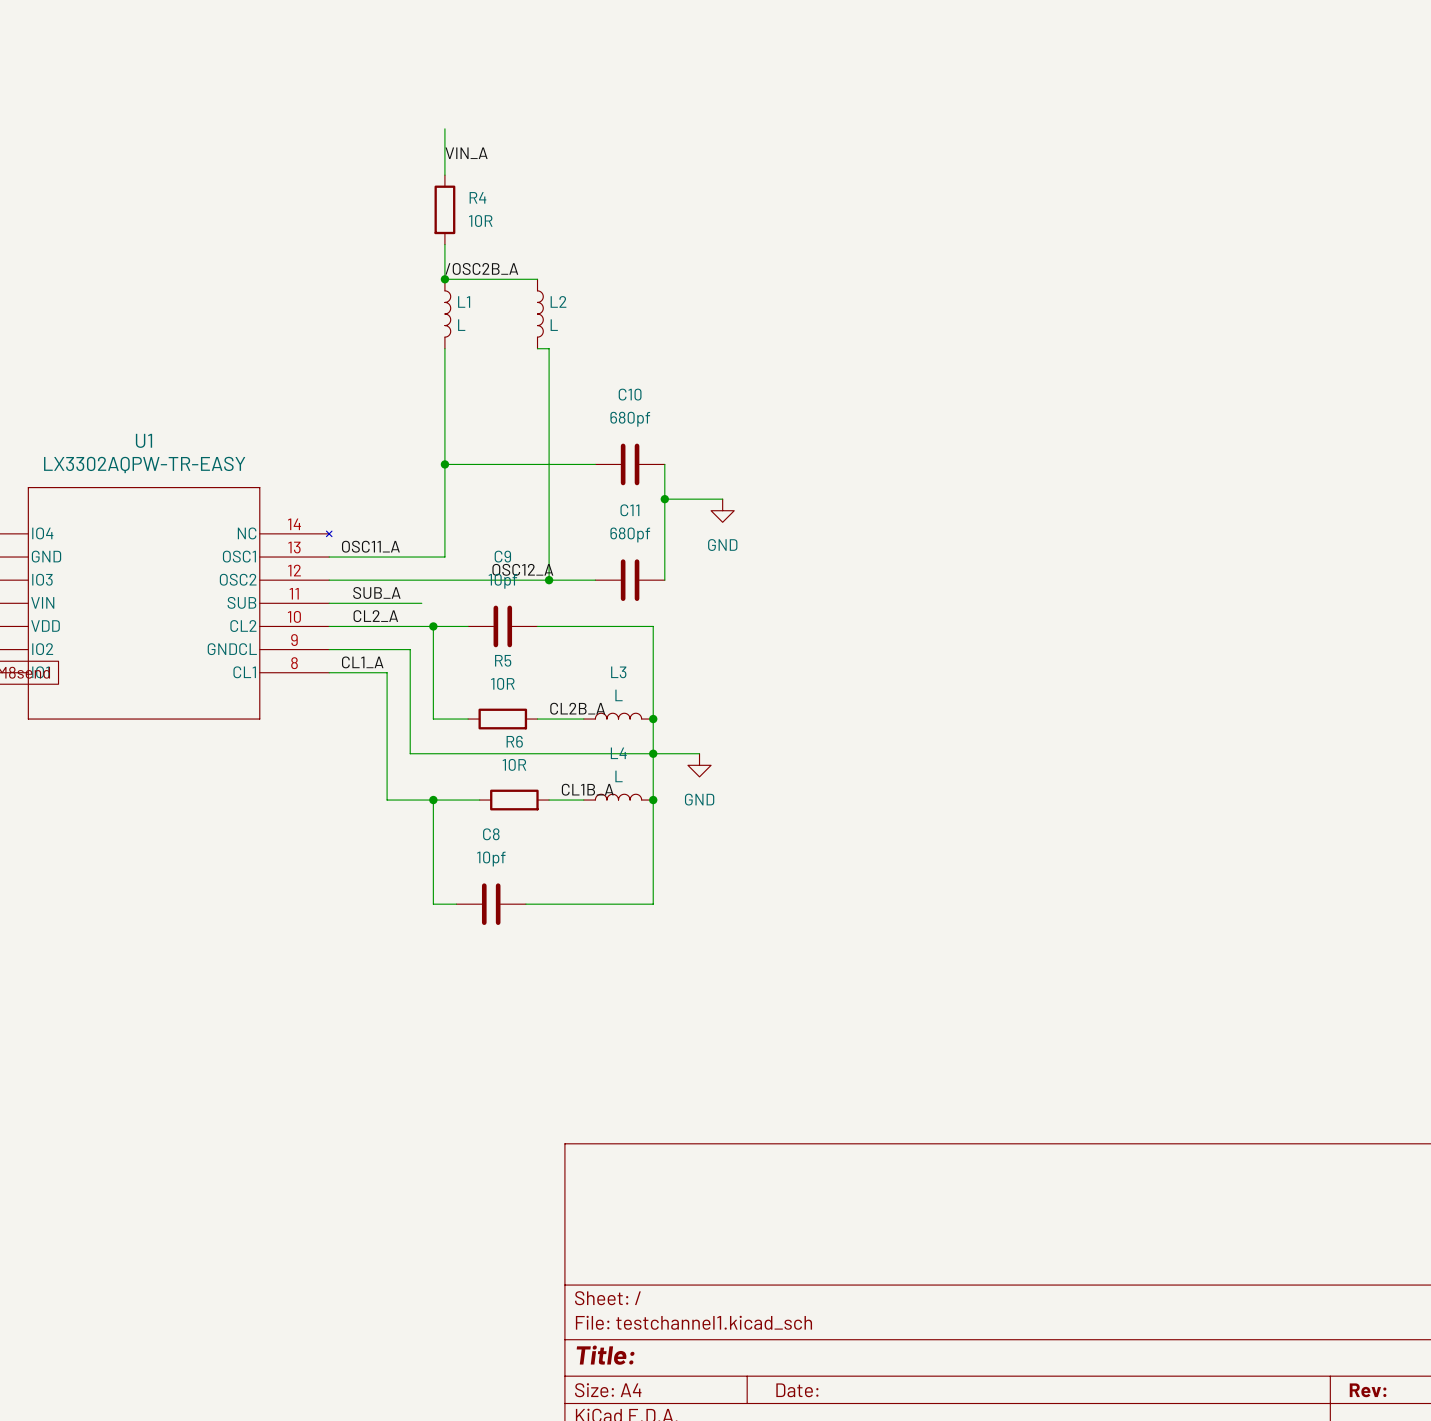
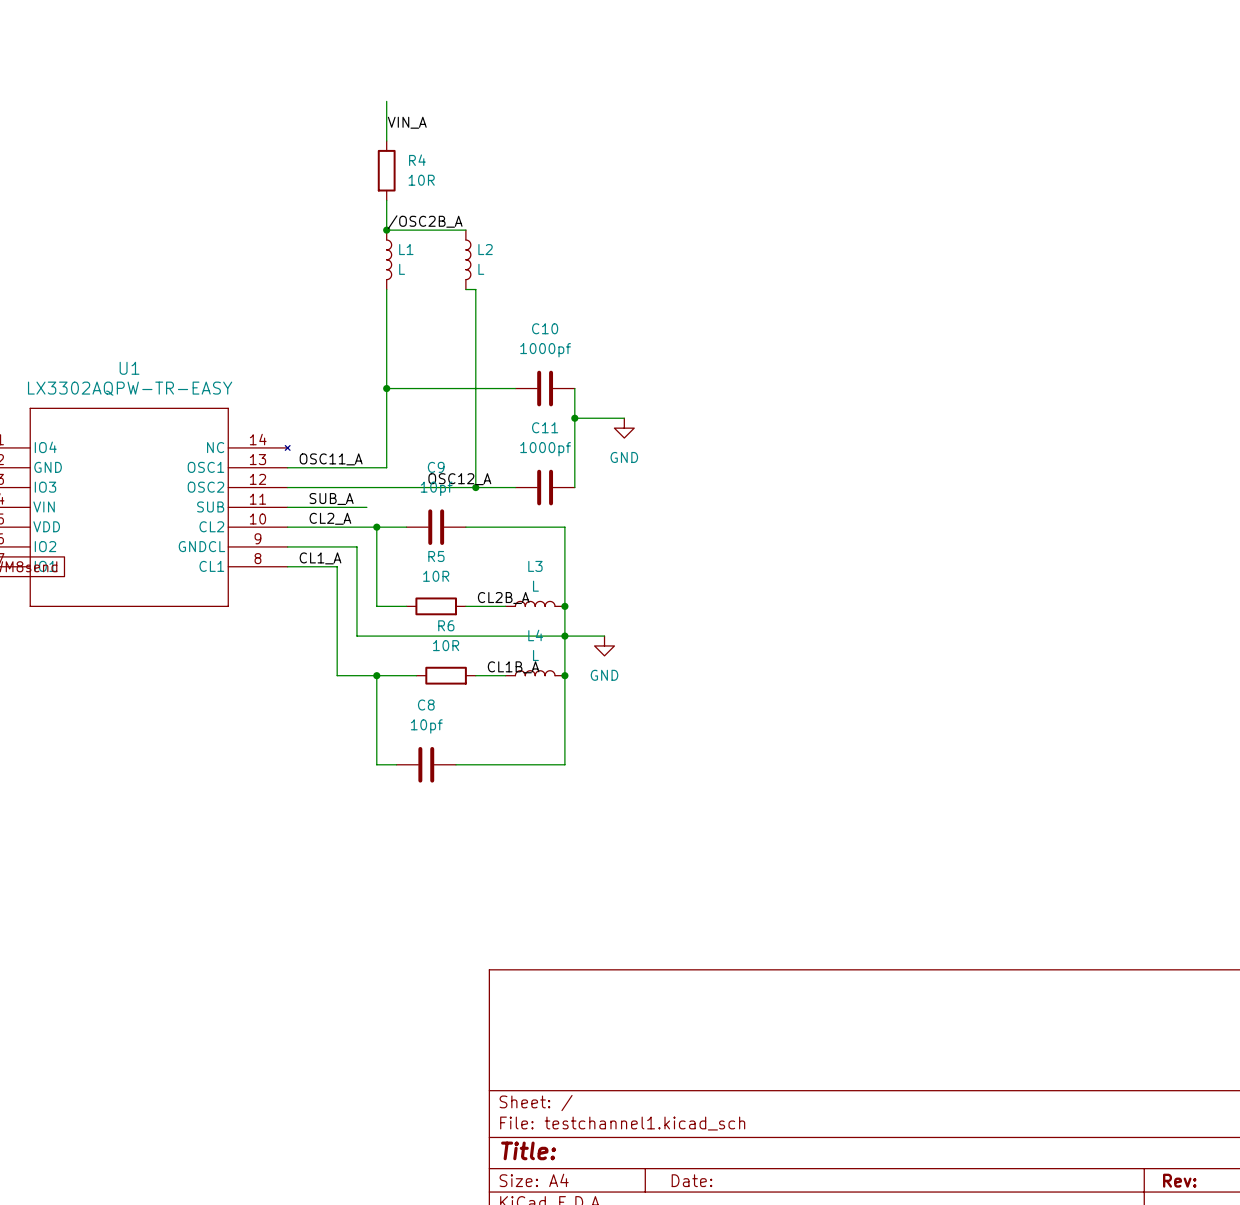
C10 value: 680pf (630, 419) -> 1000pf (545, 350)
C11 value: 680pf (630, 534) -> 1000pf (545, 449)

